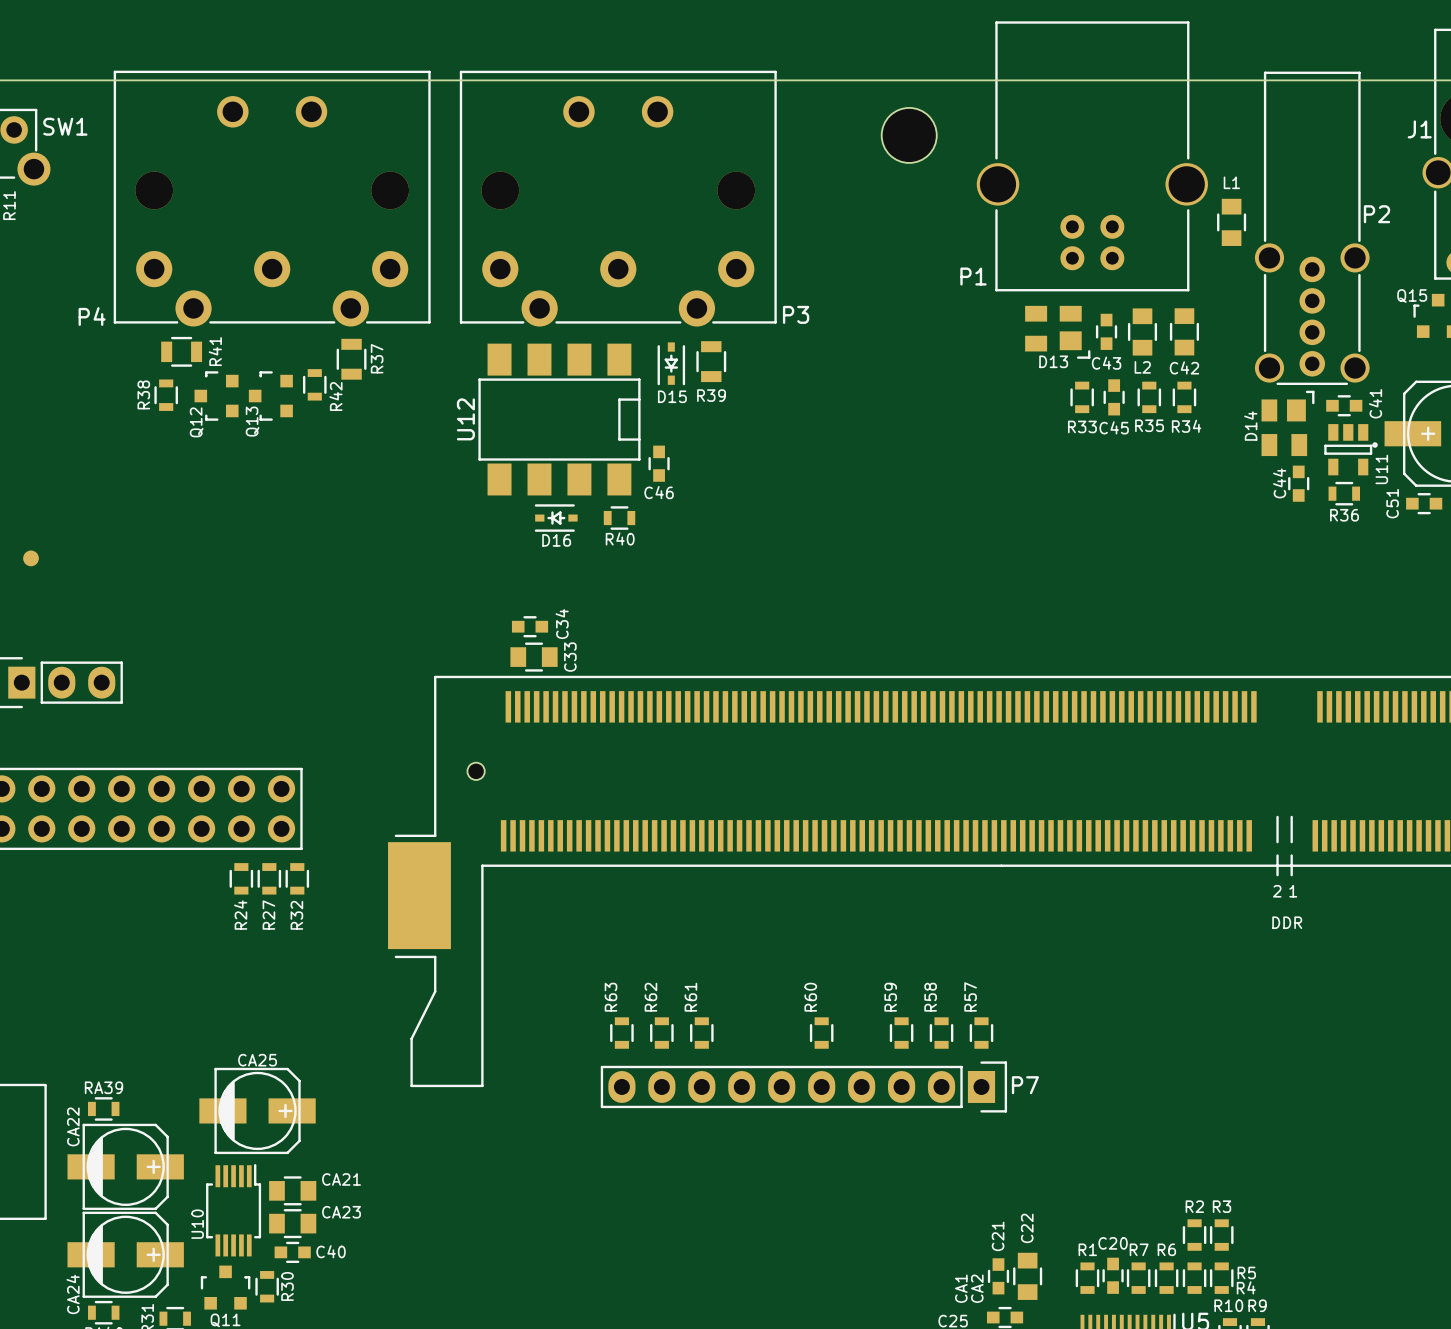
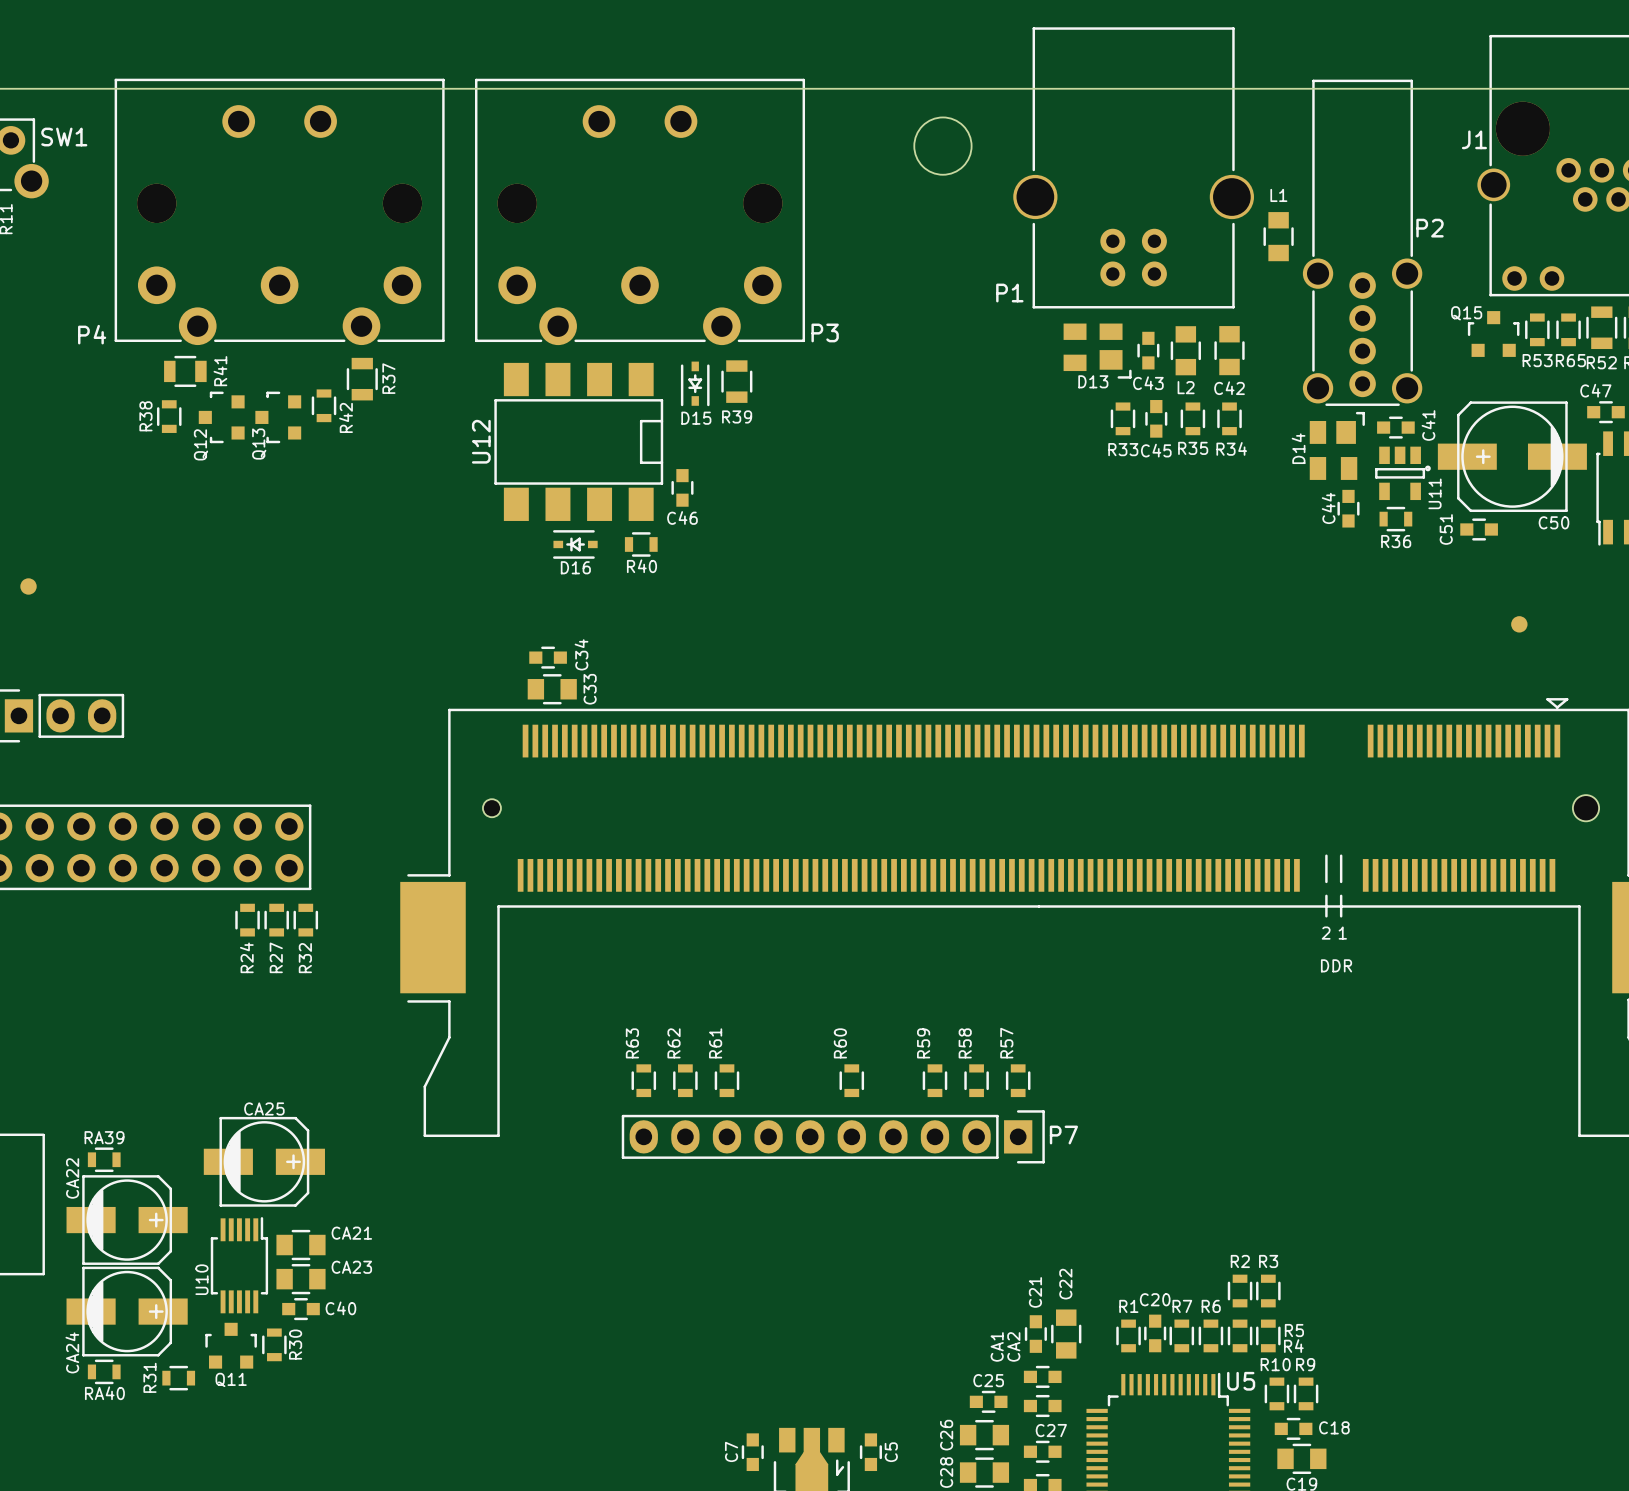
part: (909, 135) -> none

